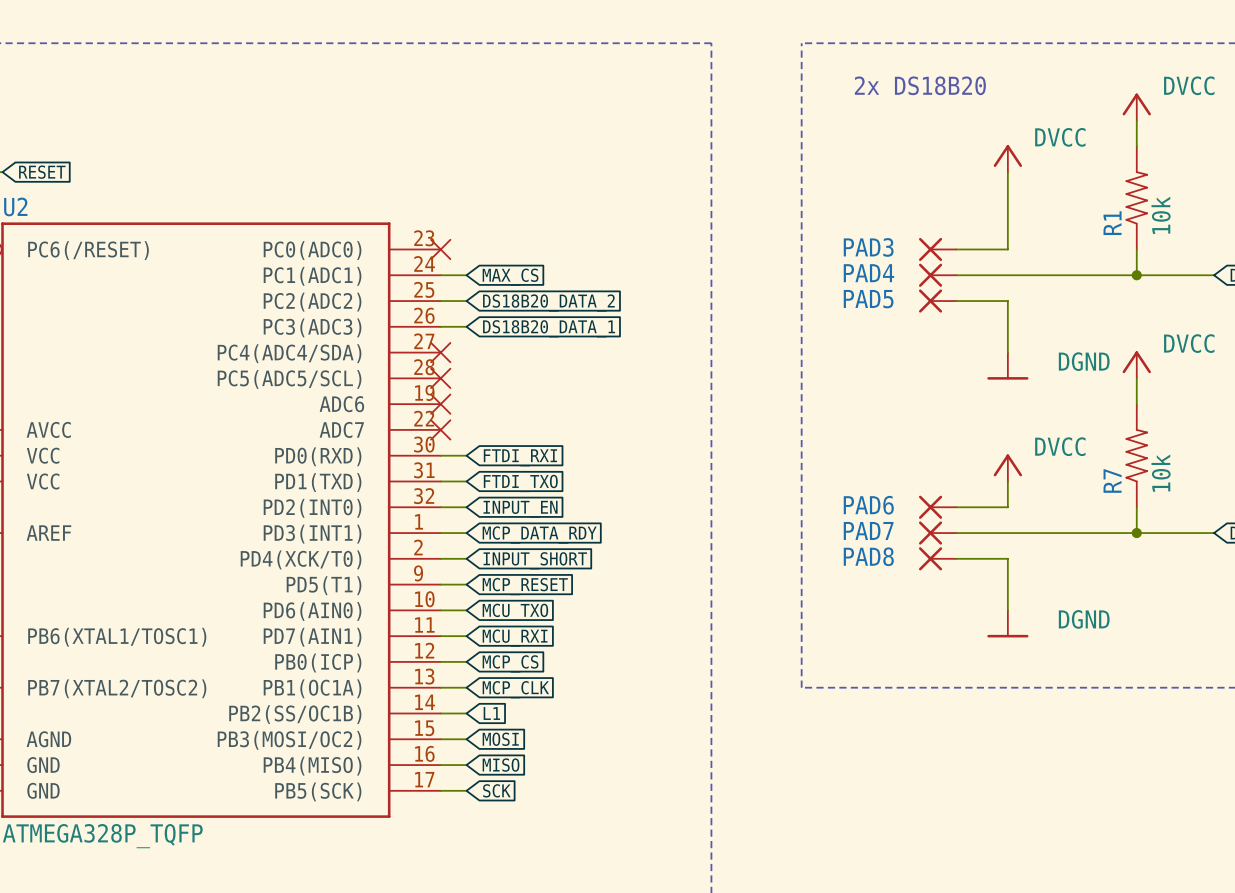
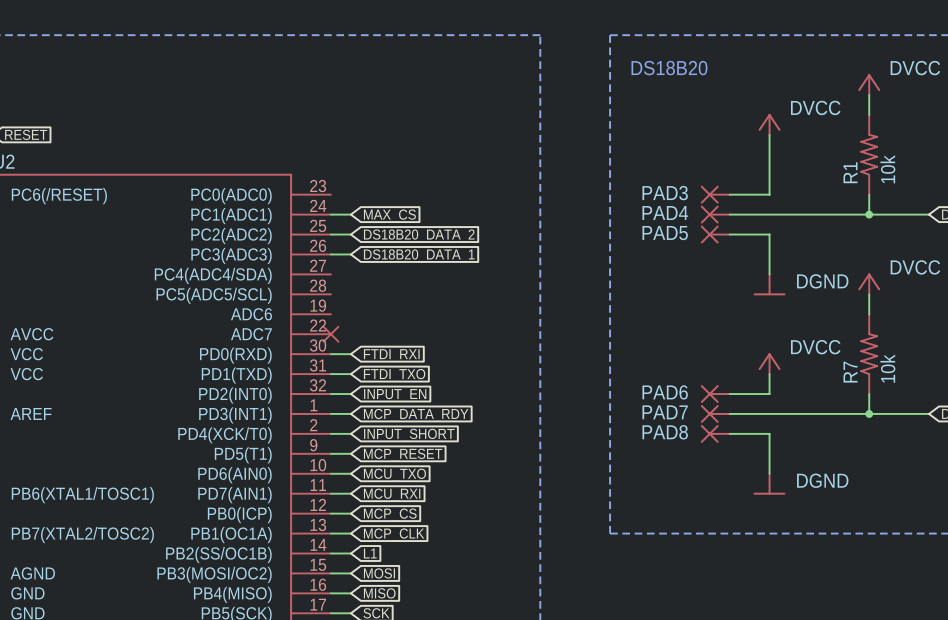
text: 2x DS18B20 (920, 85) -> DS18B20 (669, 68)
part: (440, 249) -> none
part: (440, 352) -> none
part: (440, 378) -> none
part: (440, 404) -> none

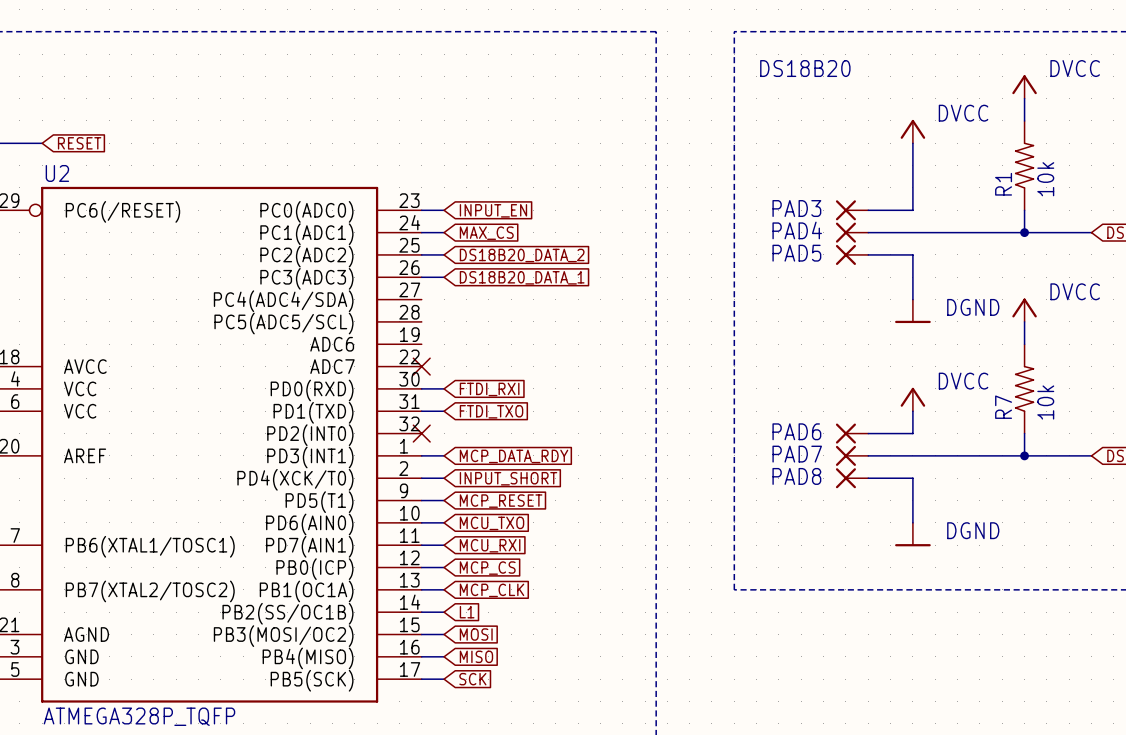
wire: none -> (421, 210) (444, 210)
global label: none -> INPUT_EN (493, 210)
wire: (330, 394) (350, 394) -> none
part: none -> (421, 433)
global label: INPUT_EN (395, 395) -> none

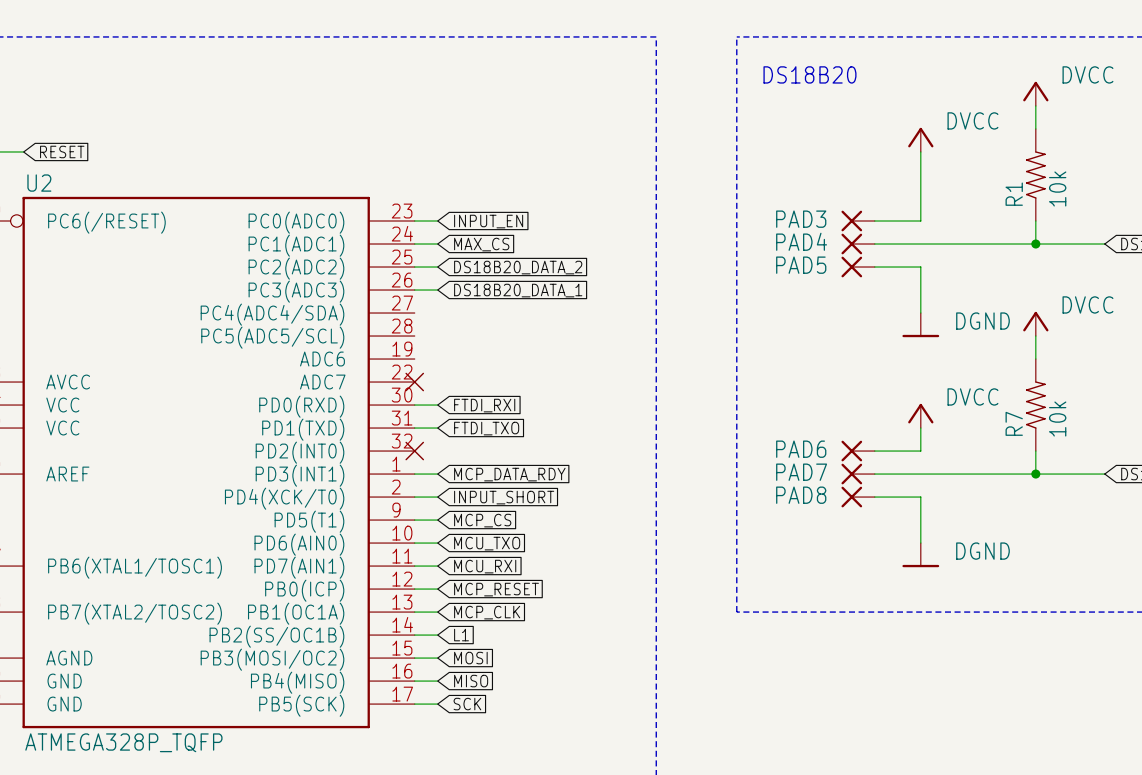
global label: MCP_RESET (501, 501) -> MCP_CS (482, 520)
global label: MCP_CS (487, 568) -> MCP_RESET (496, 589)

